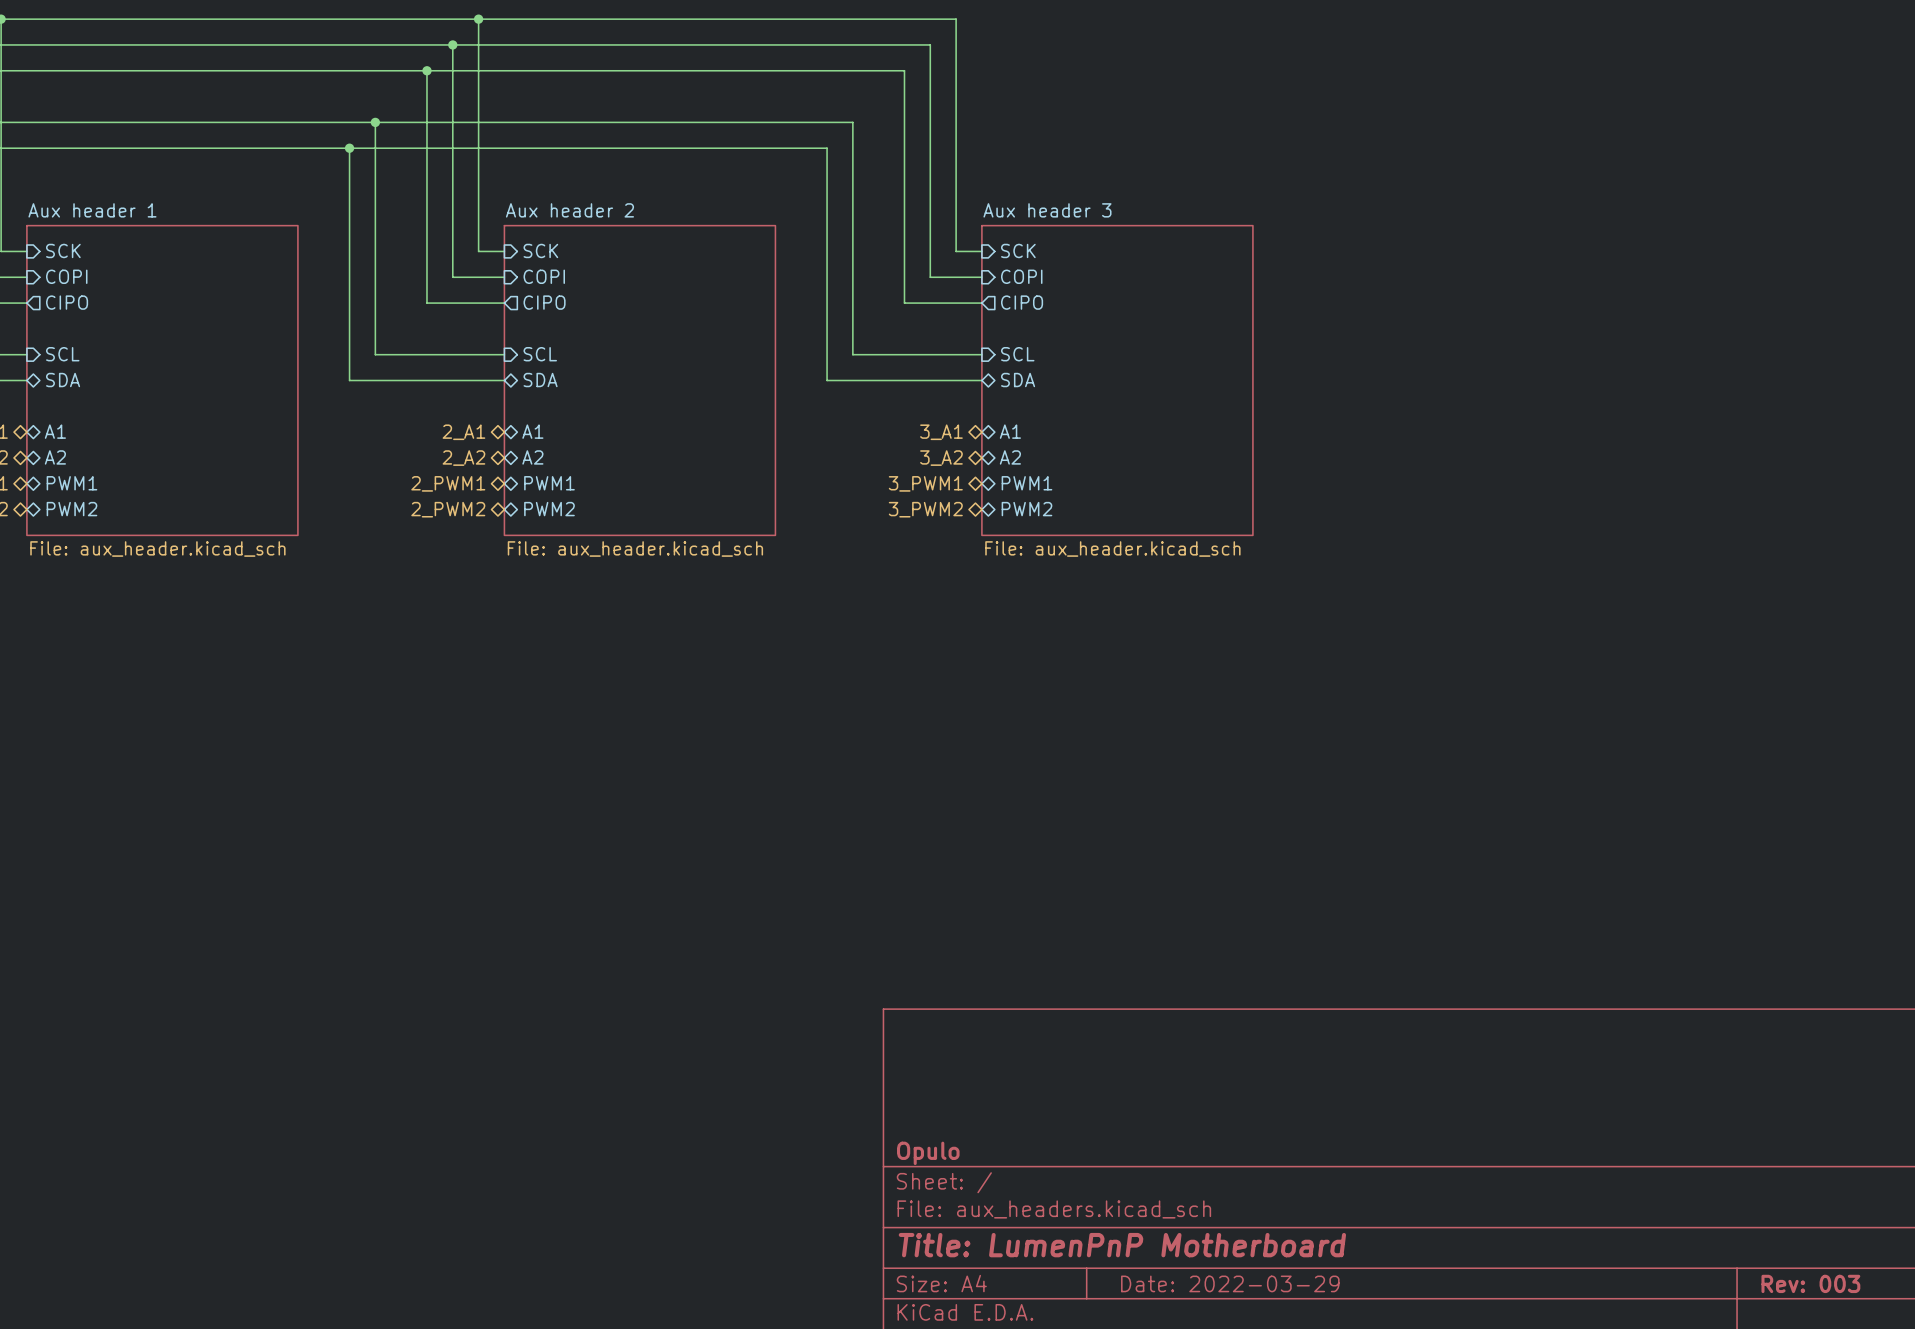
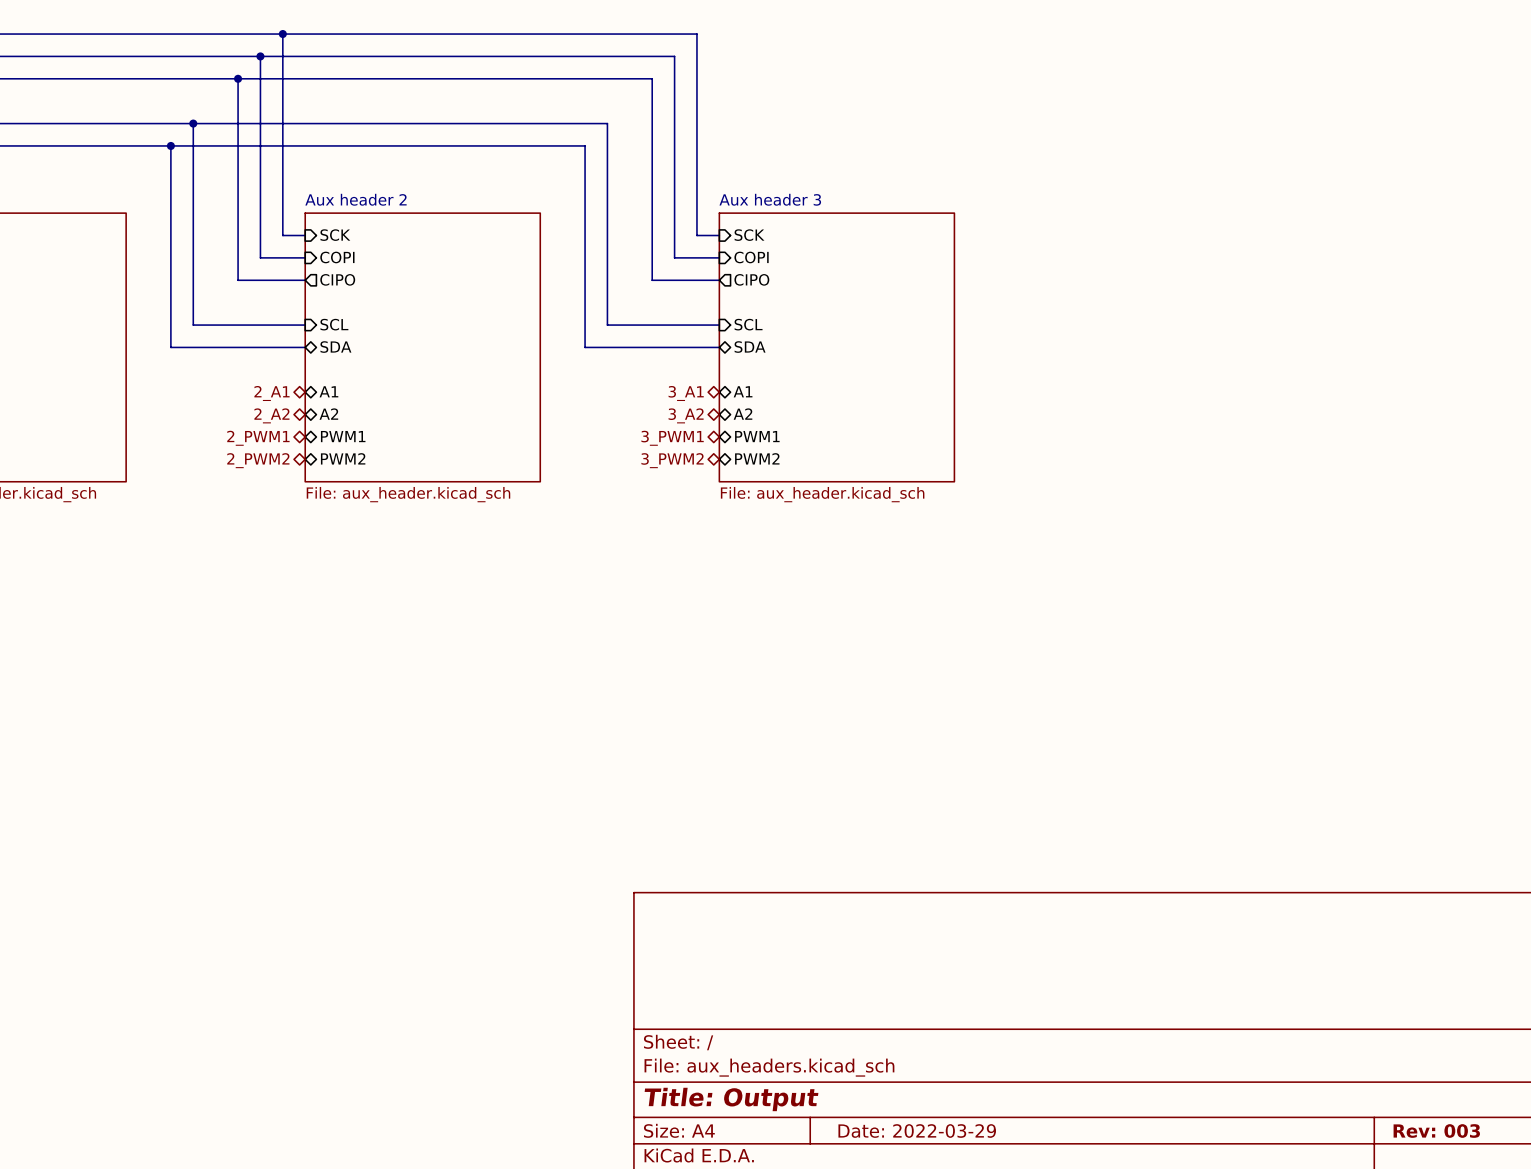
title block: Opulo (928, 1153) -> none
title block: Title: LumenPnP Motherboard (1122, 1245) -> Title: Output (731, 1099)

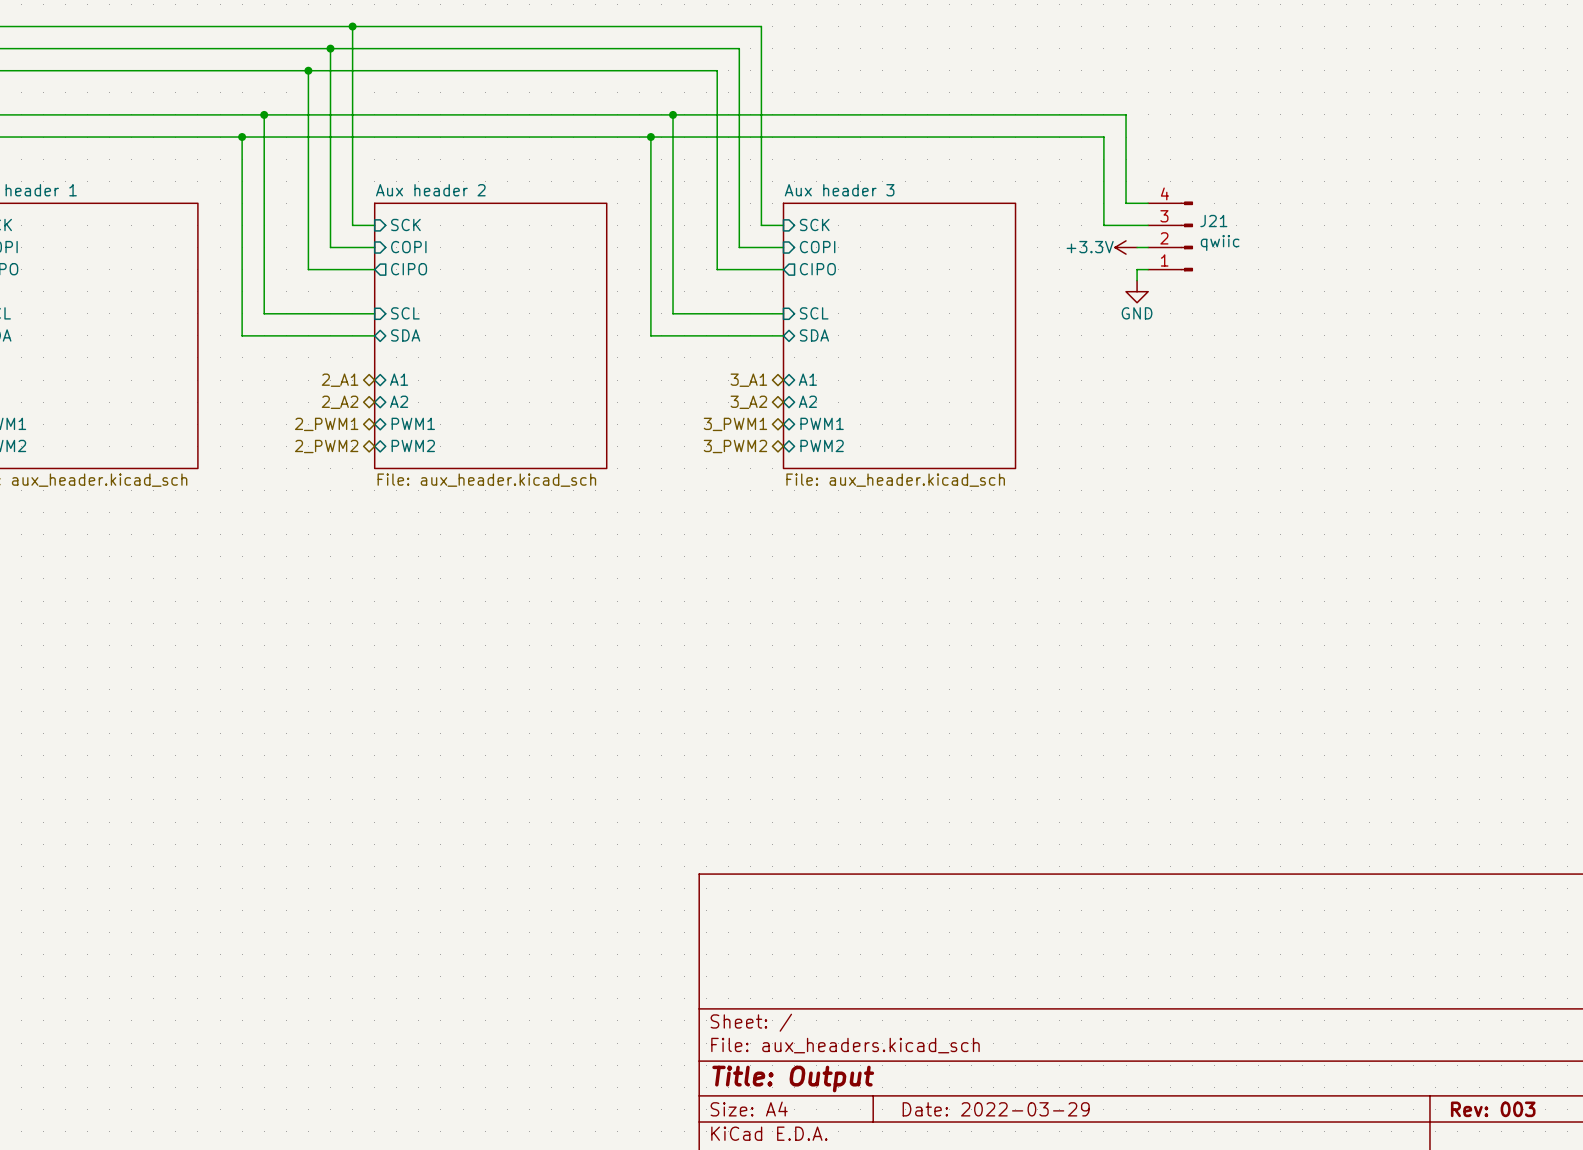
wire: none -> (673, 114) (1126, 114) (1126, 203) (1148, 203)
junction: none -> (673, 114)
wire: none -> (650, 137) (1103, 137) (1103, 225) (1148, 225)
junction: none -> (650, 137)
J21: none -> qwiic (1170, 236)
power symbol: none -> +3.3V (1126, 247)
wire: none -> (1137, 247) (1148, 247)
wire: none -> (1148, 269) (1137, 269) (1137, 280)
power symbol: none -> GND (1137, 291)

